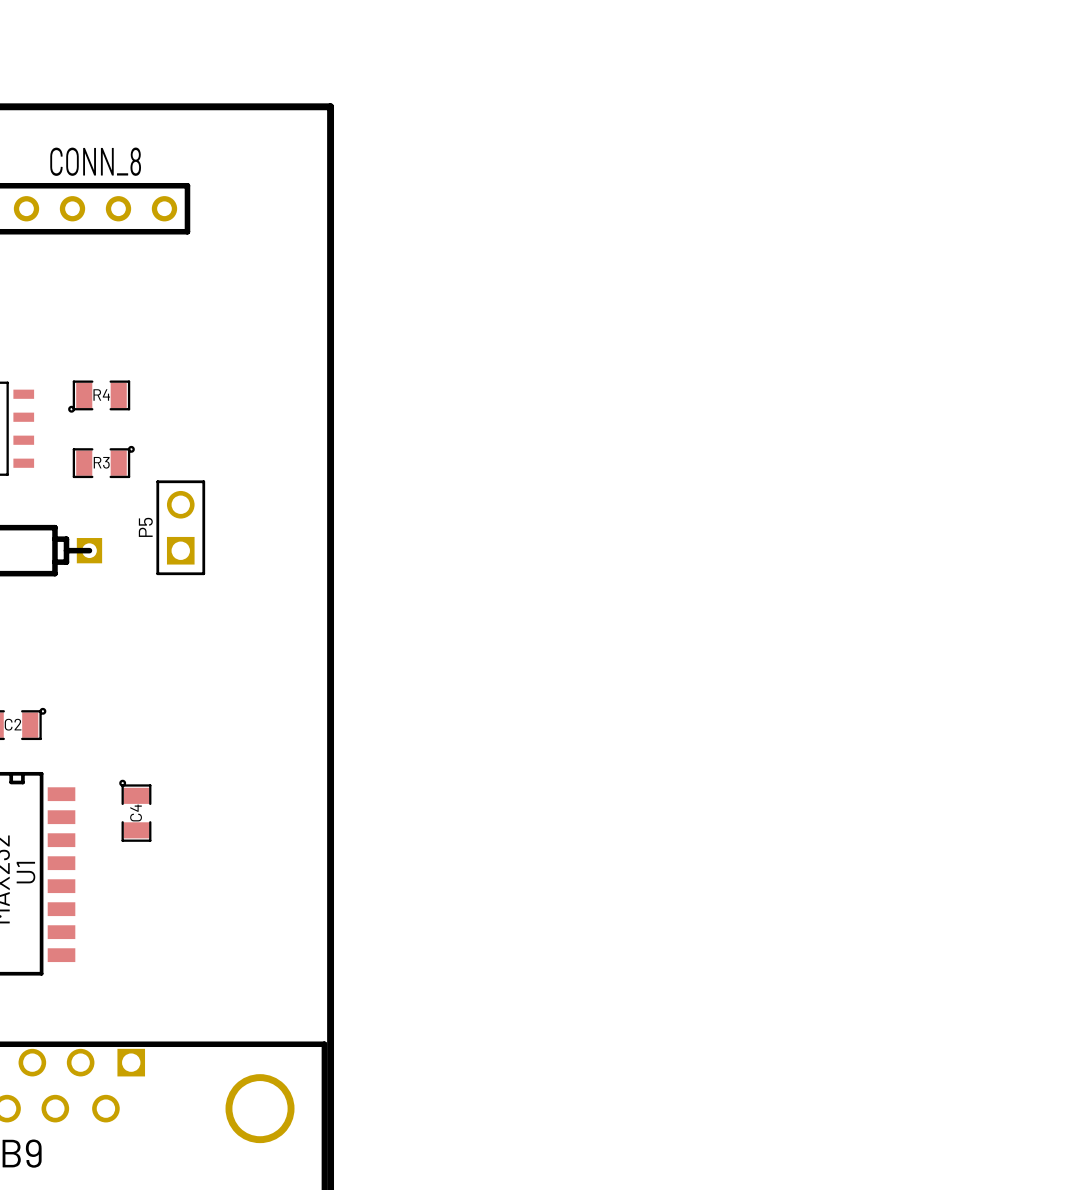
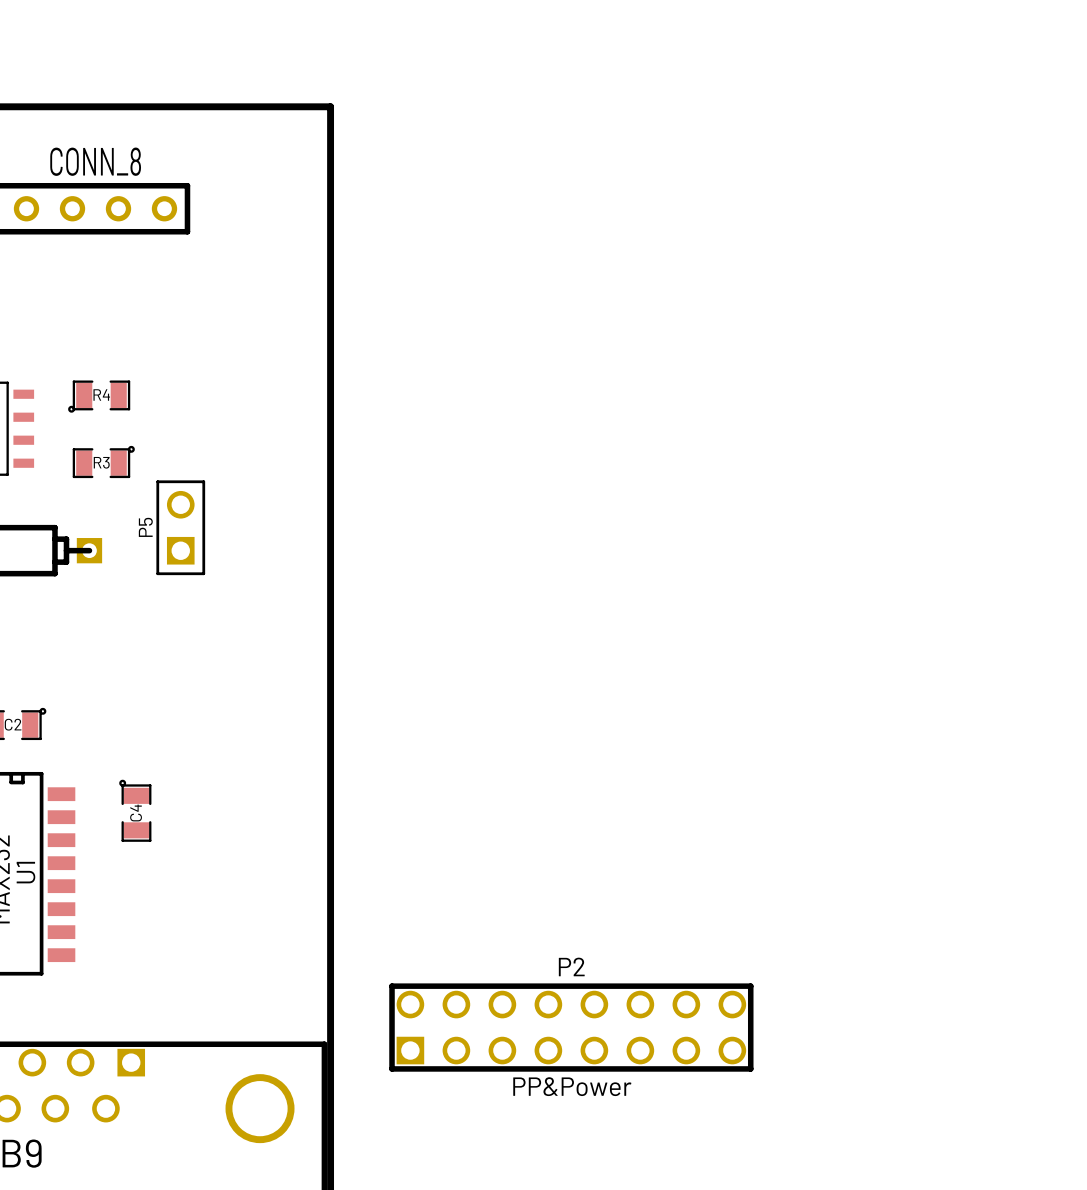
P2: none -> PP&Power (571, 1027)

